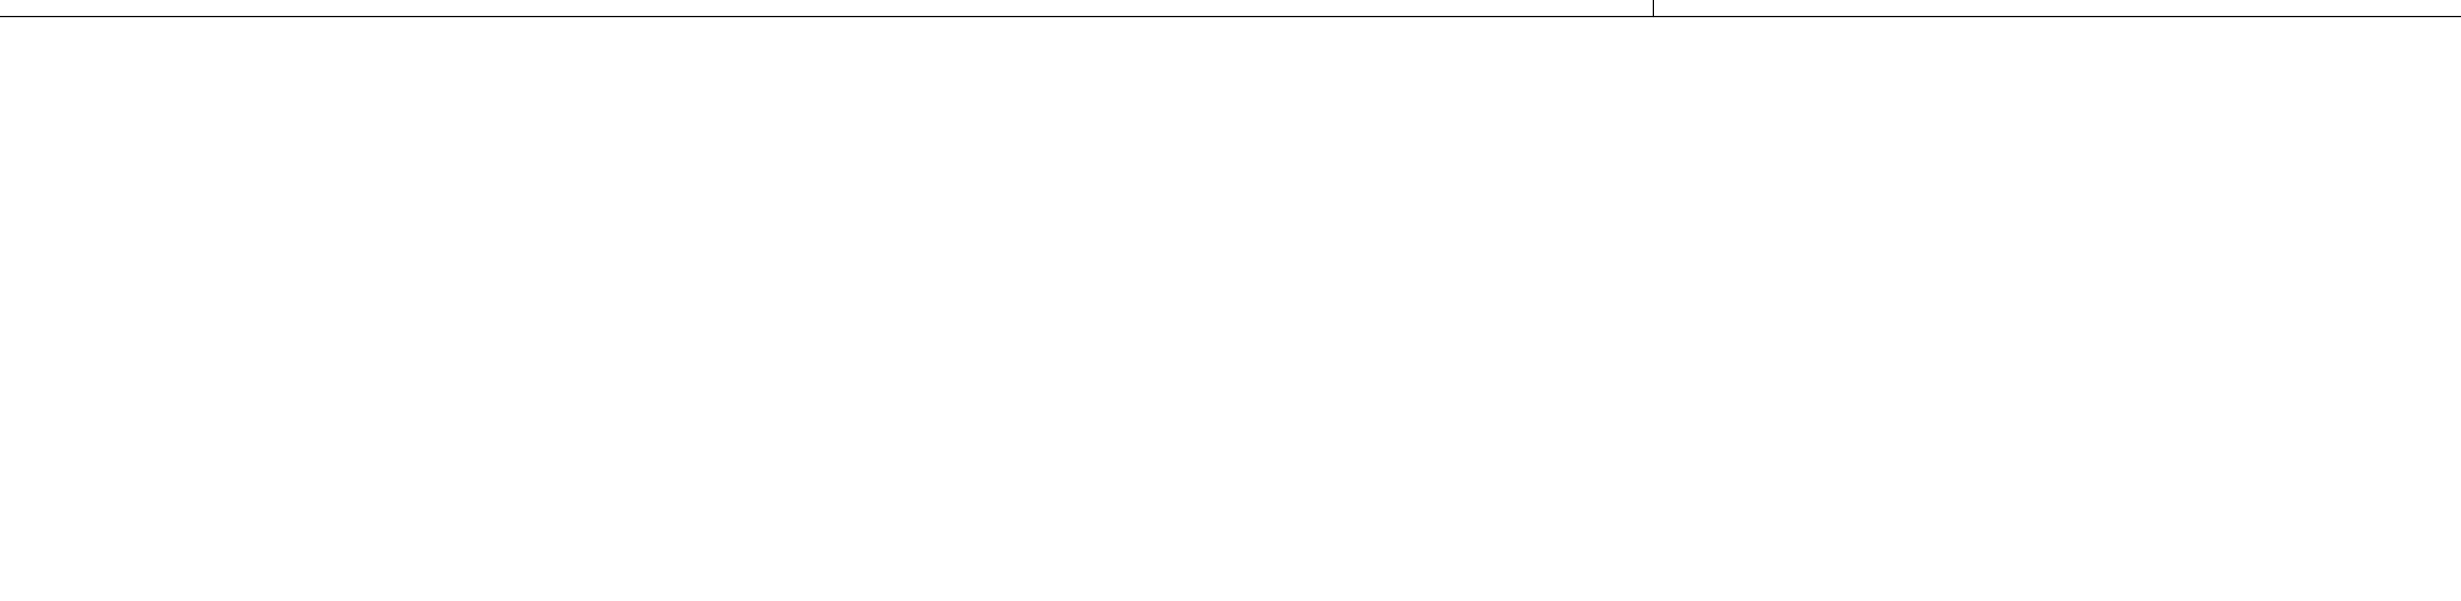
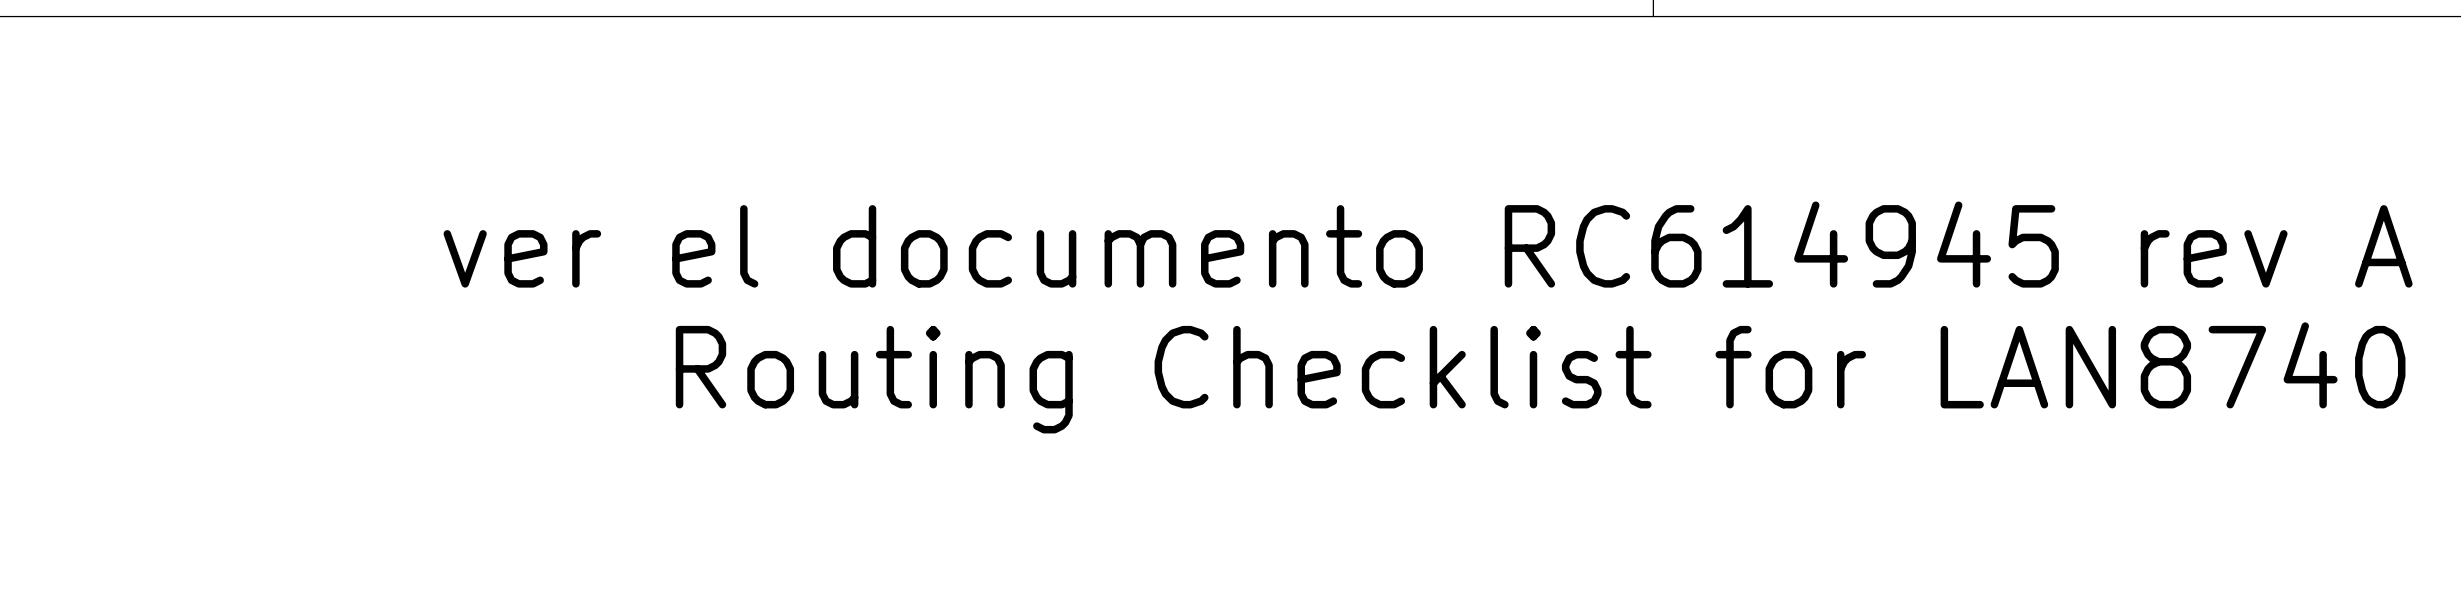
text: none -> ver el documento RC614945 rev A (1428, 244)
text: none -> Routing Checklist for LAN8740 (1540, 377)

